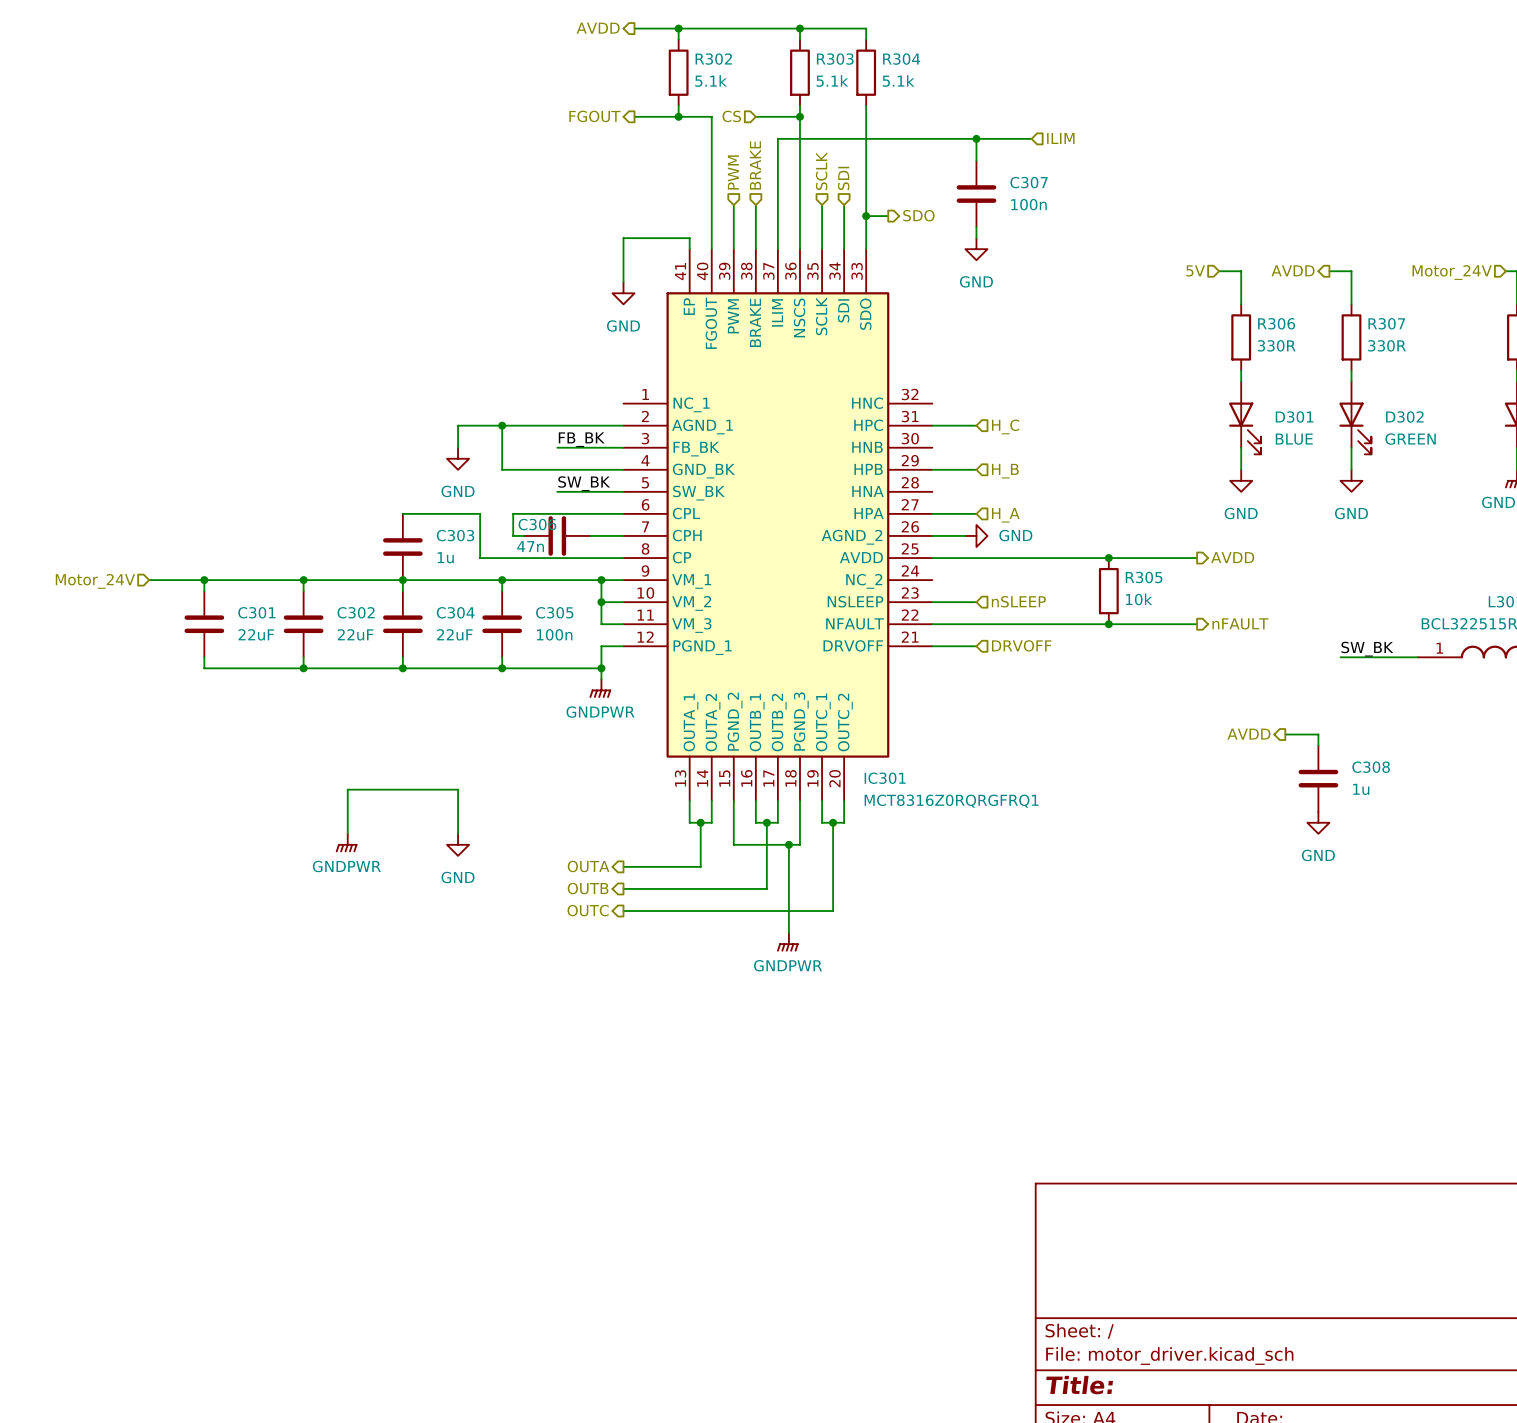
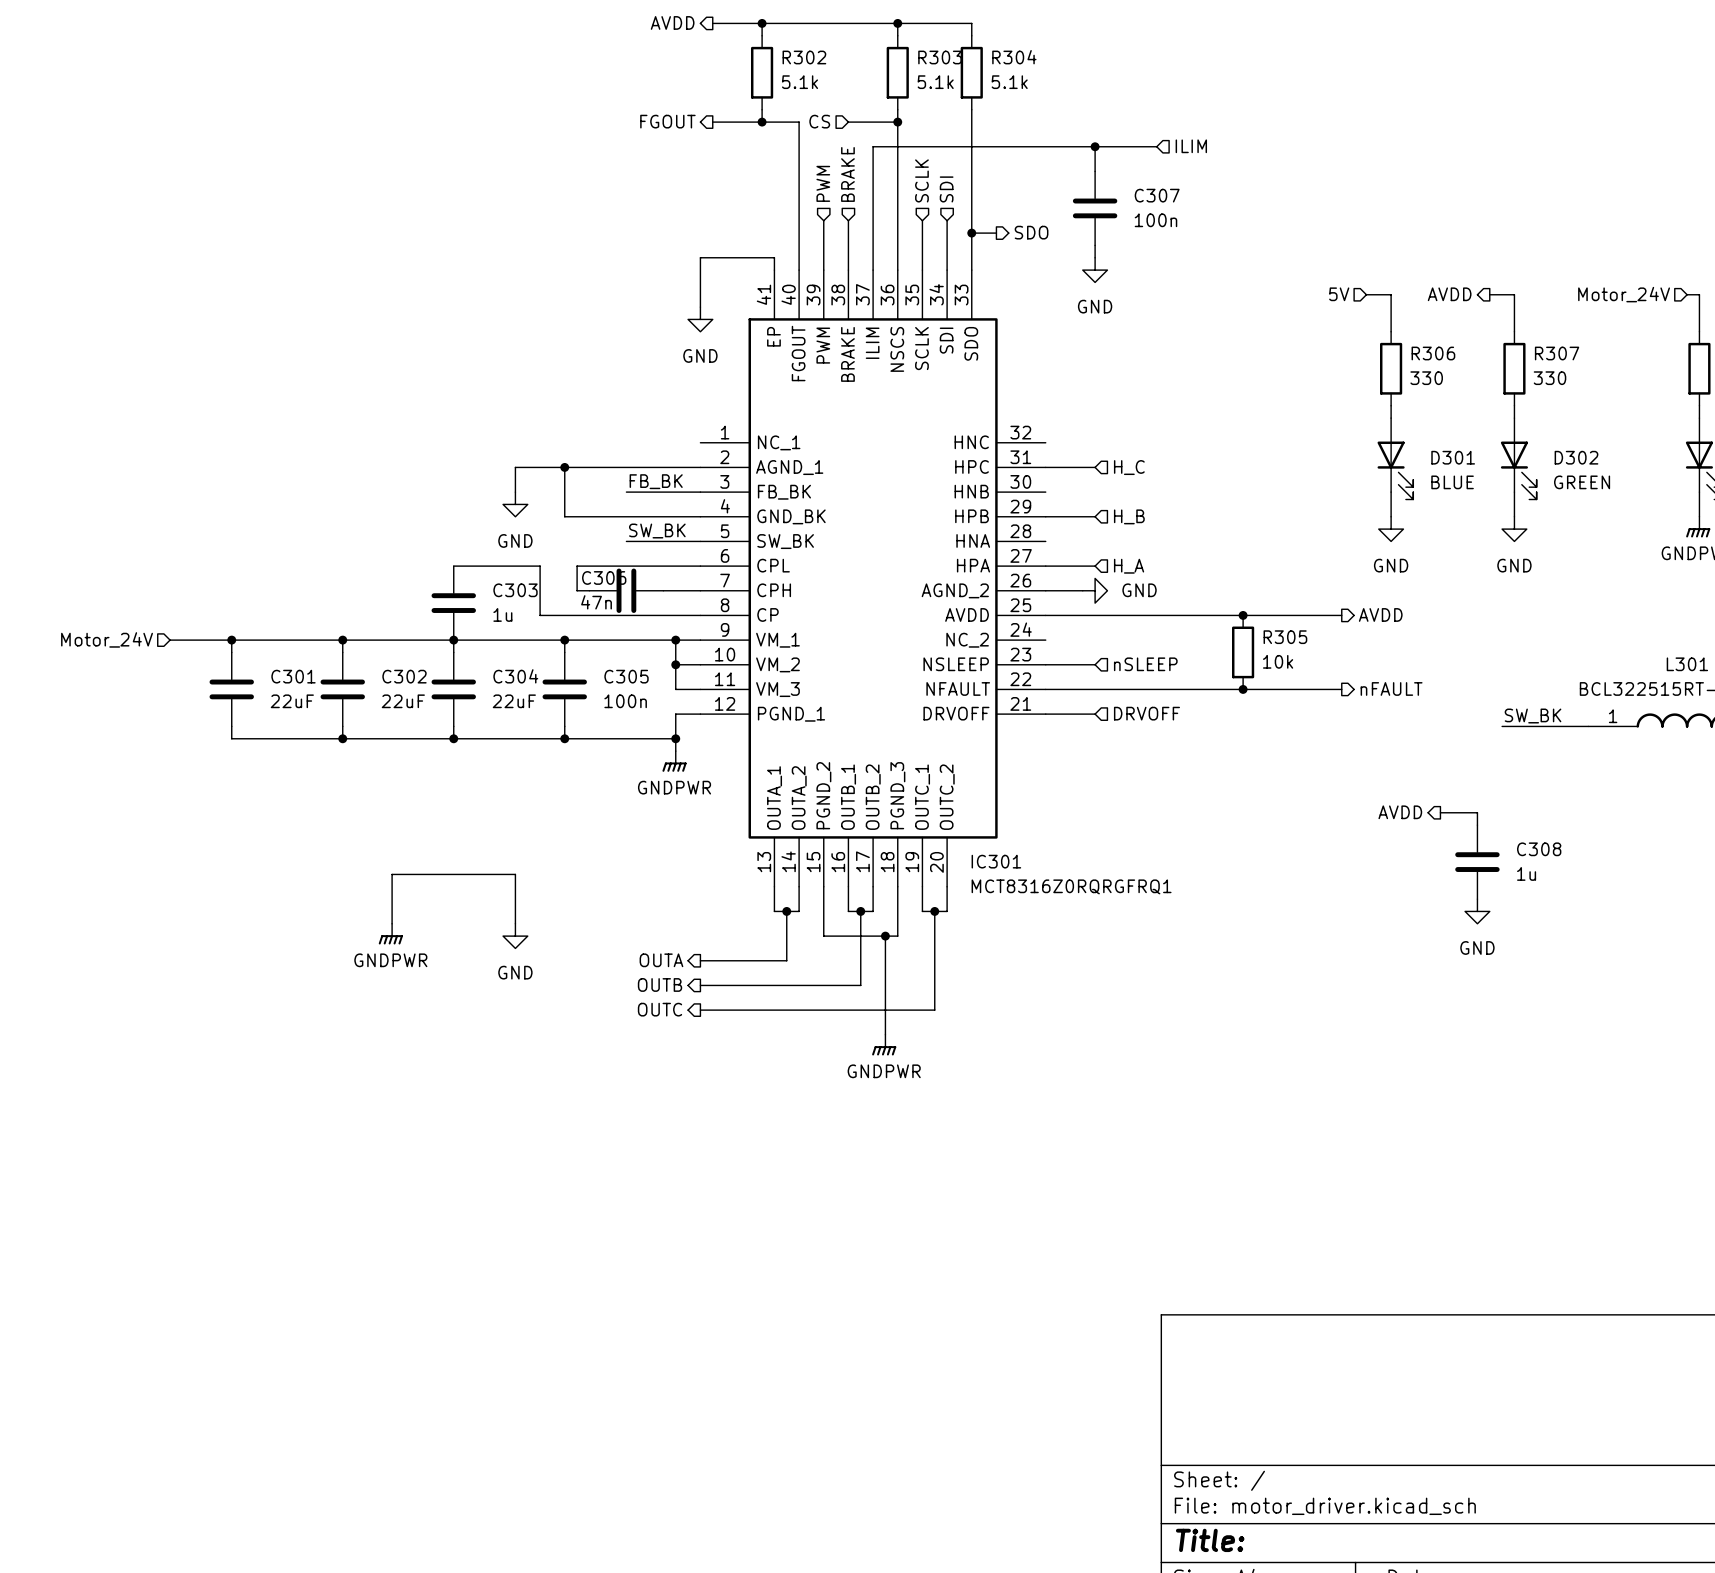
R306 value: 330R (1276, 345) -> 330 (1426, 378)
R307 value: 330R (1387, 345) -> 330 (1550, 378)

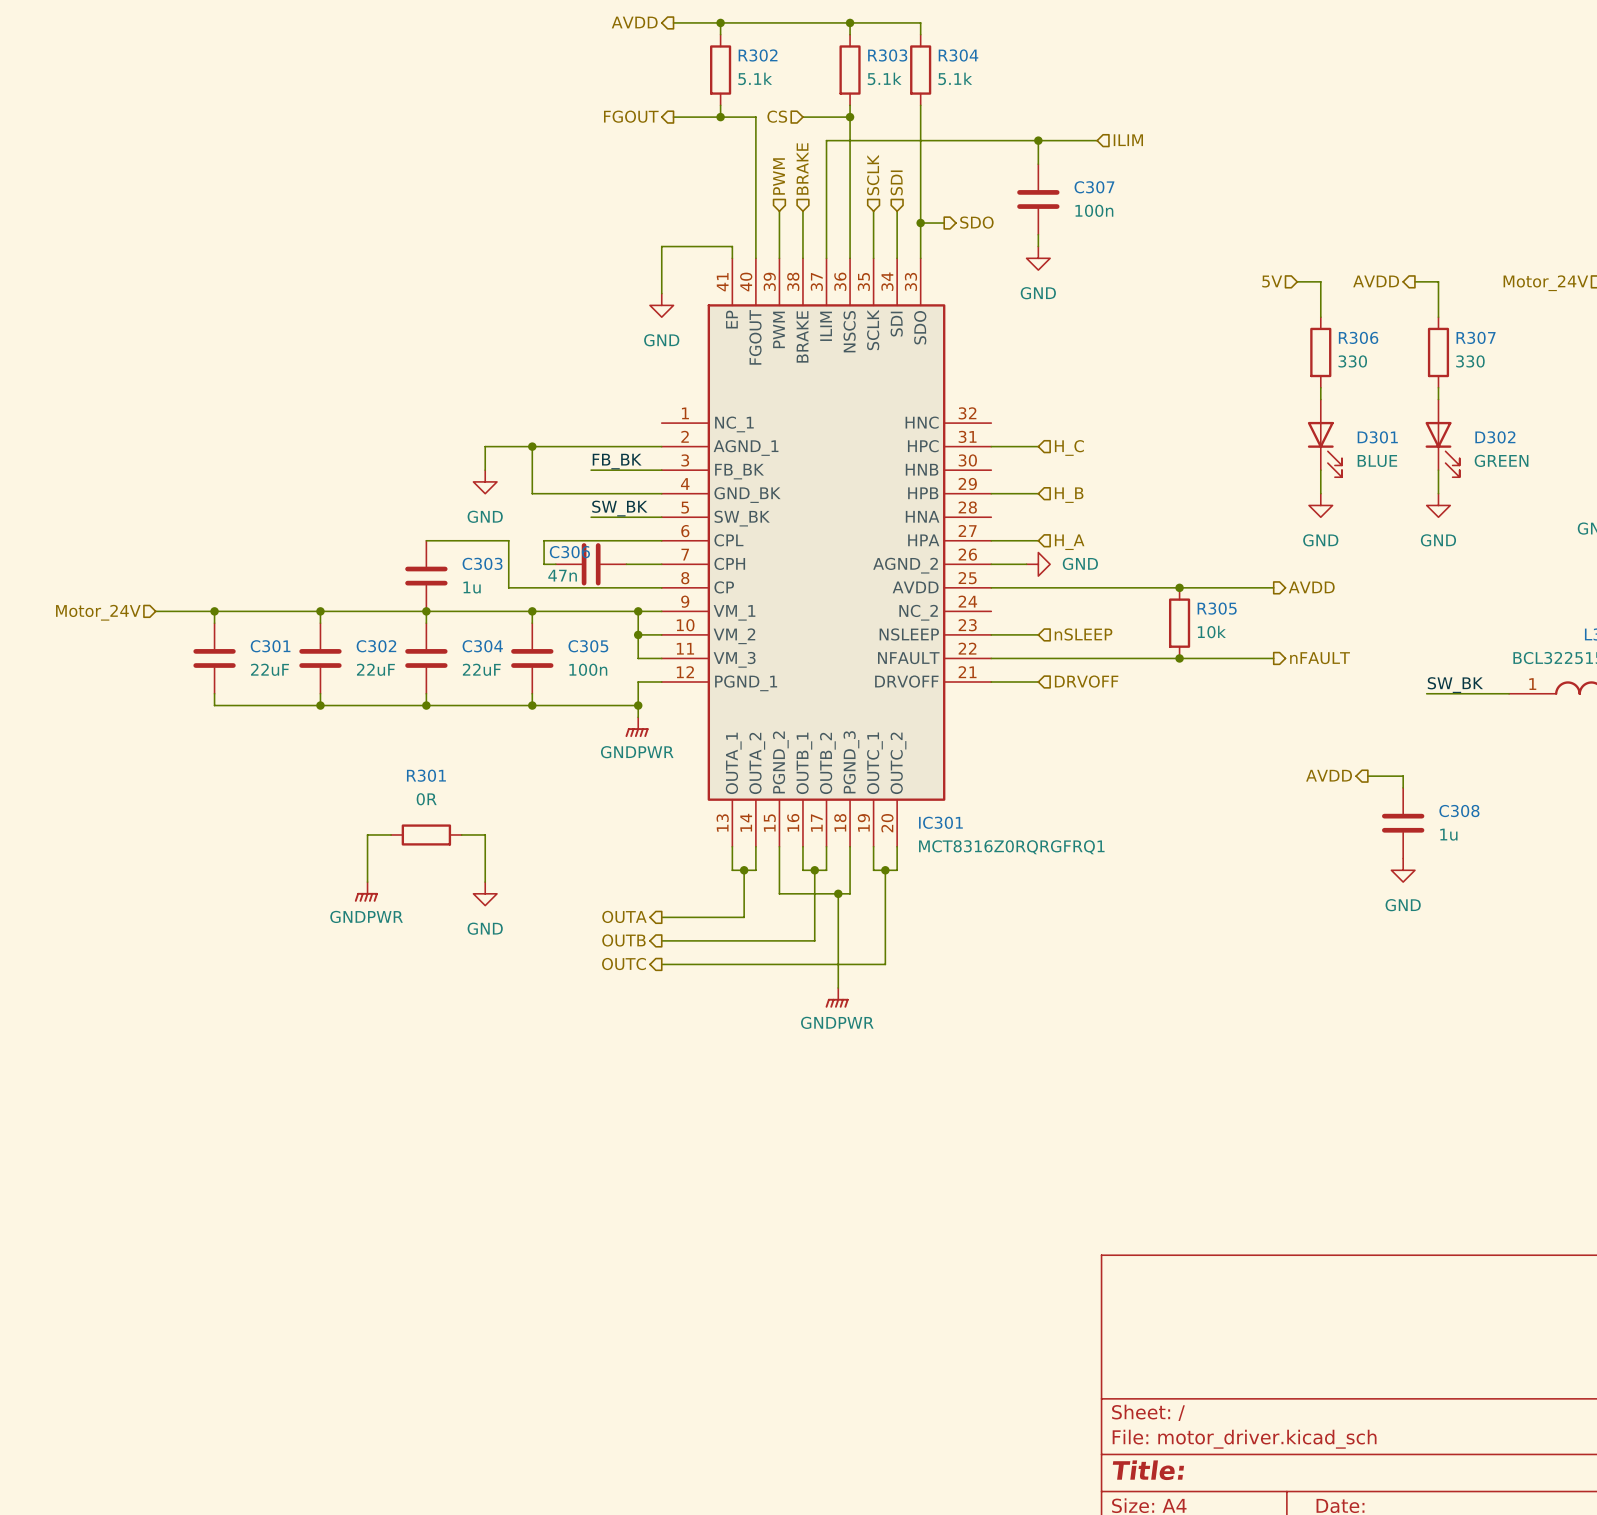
wire: (416, 874) (490, 874) -> none
R301: none -> 0R (426, 834)

